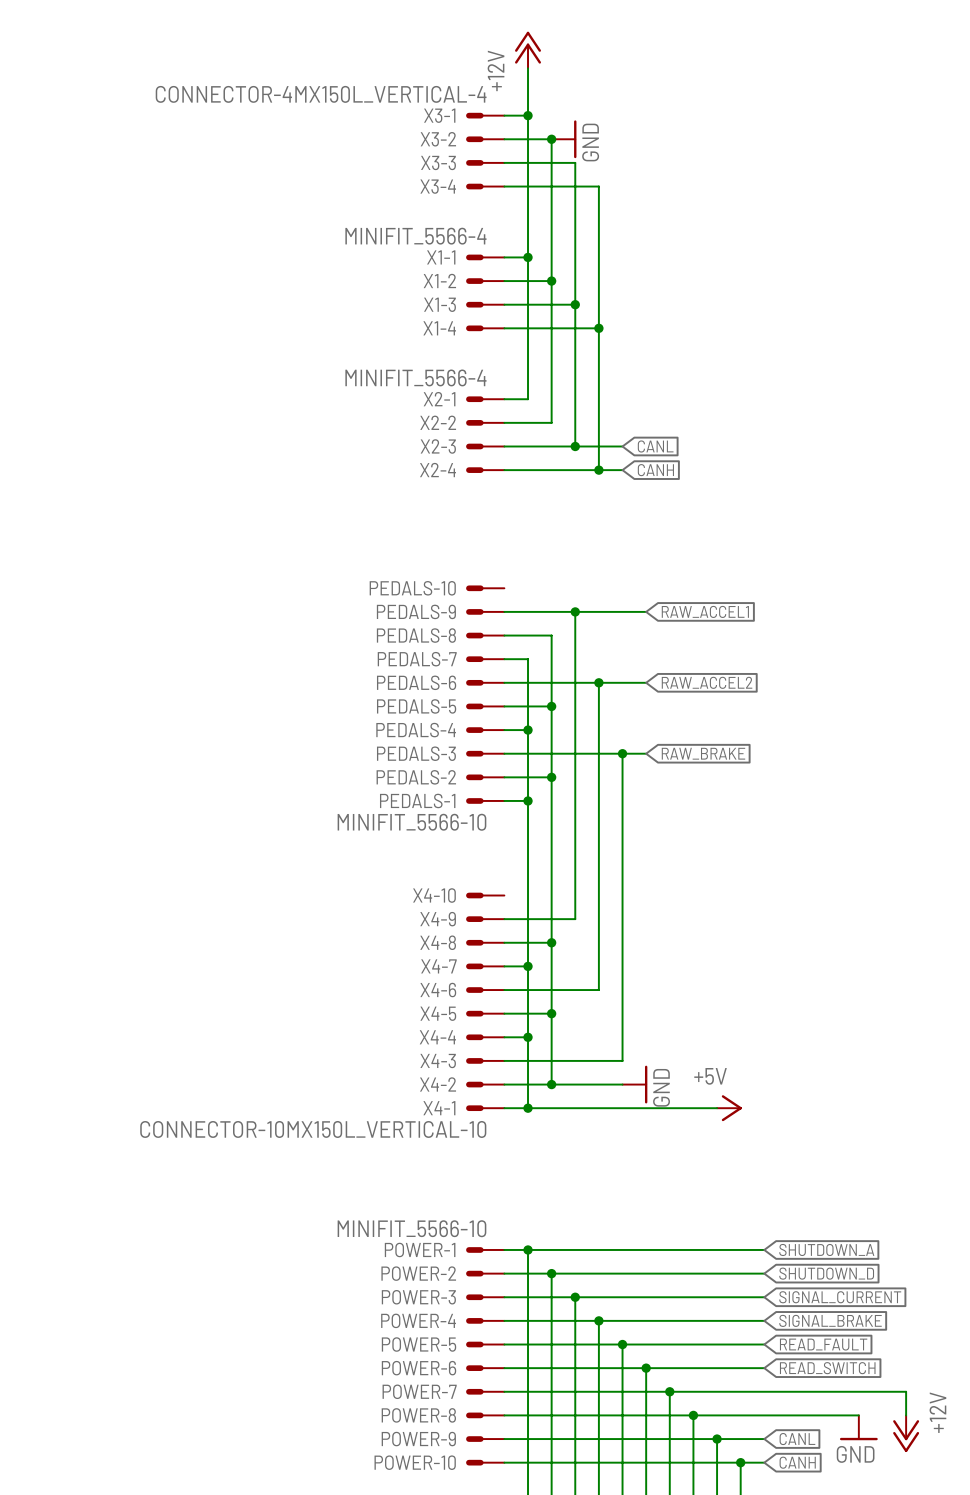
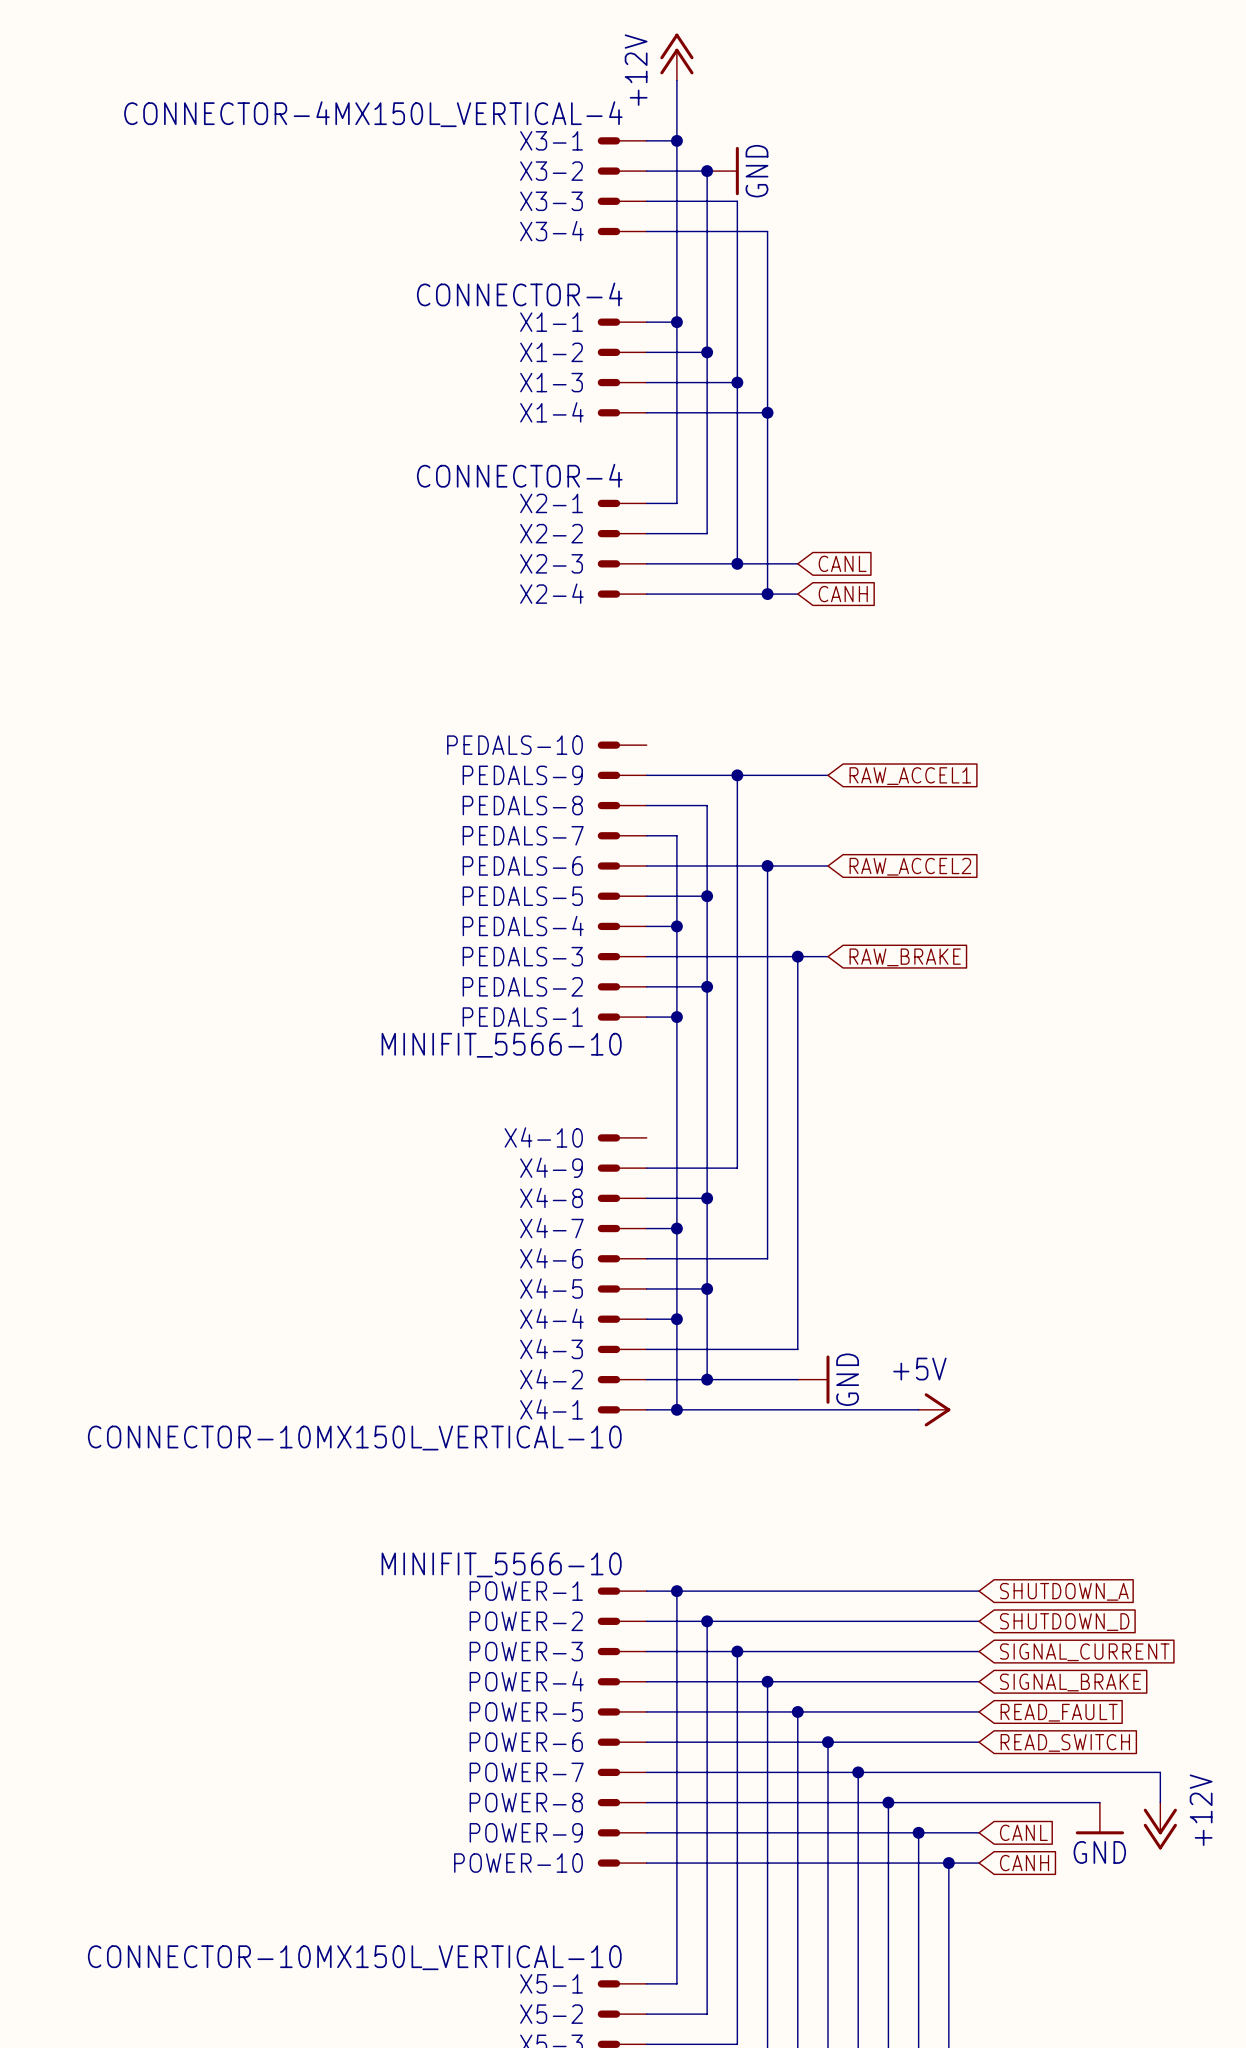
X1-1 value: MINIFIT_5566-4 (415, 236) -> CONNECTOR-4 (519, 294)
X2-1 value: MINIFIT_5566-4 (415, 377) -> CONNECTOR-4 (519, 475)

